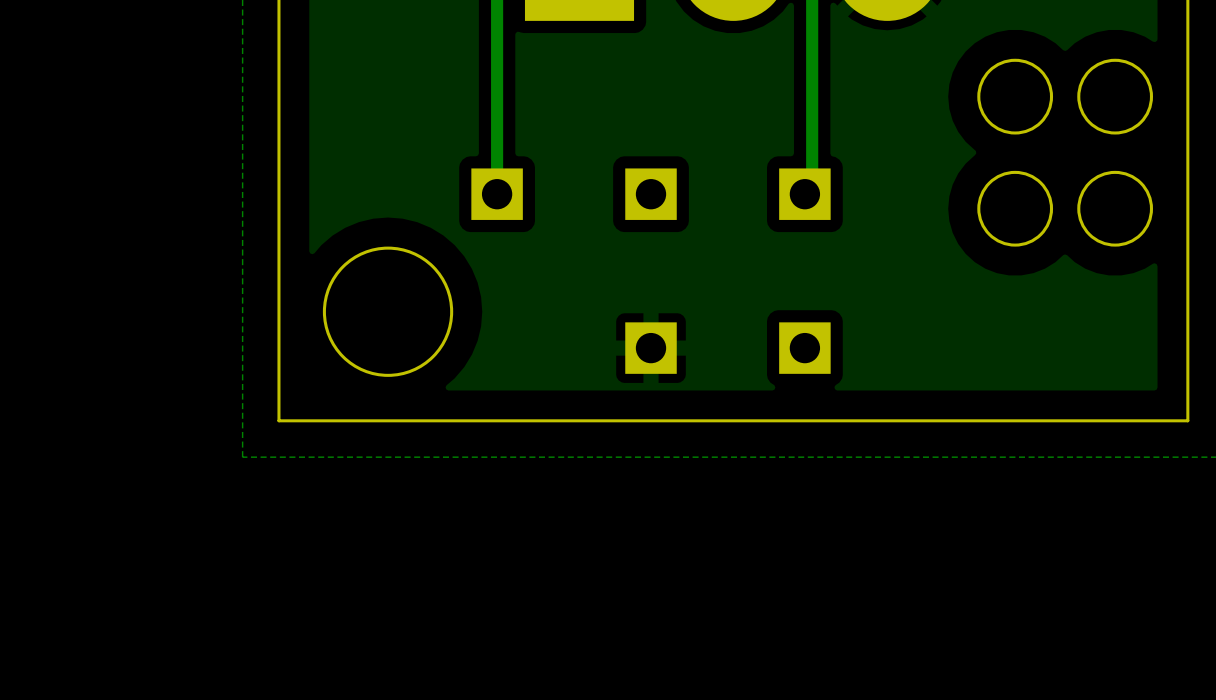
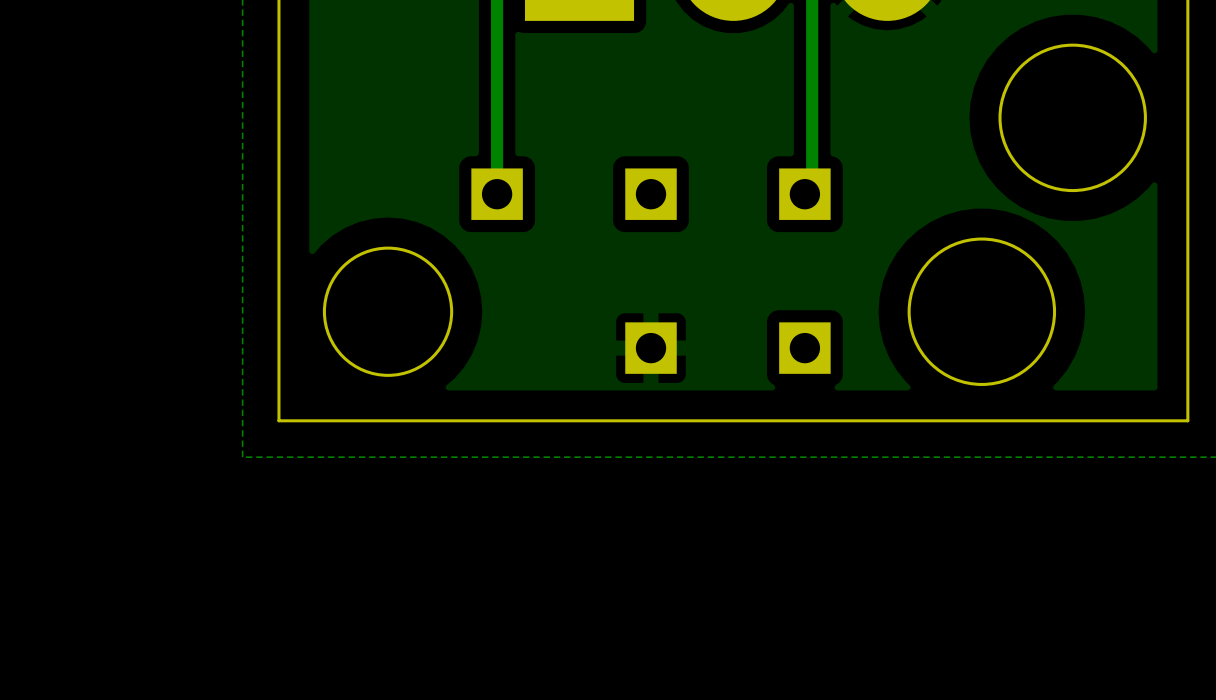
round board edge: none -> [998, 43, 1147, 193]
round board edge: [977, 58, 1054, 135] -> none
round board edge: [1077, 58, 1154, 135] -> none
round board edge: [977, 170, 1054, 247] -> none
round board edge: [1077, 170, 1154, 247] -> none
round board edge: none -> [907, 237, 1057, 386]

